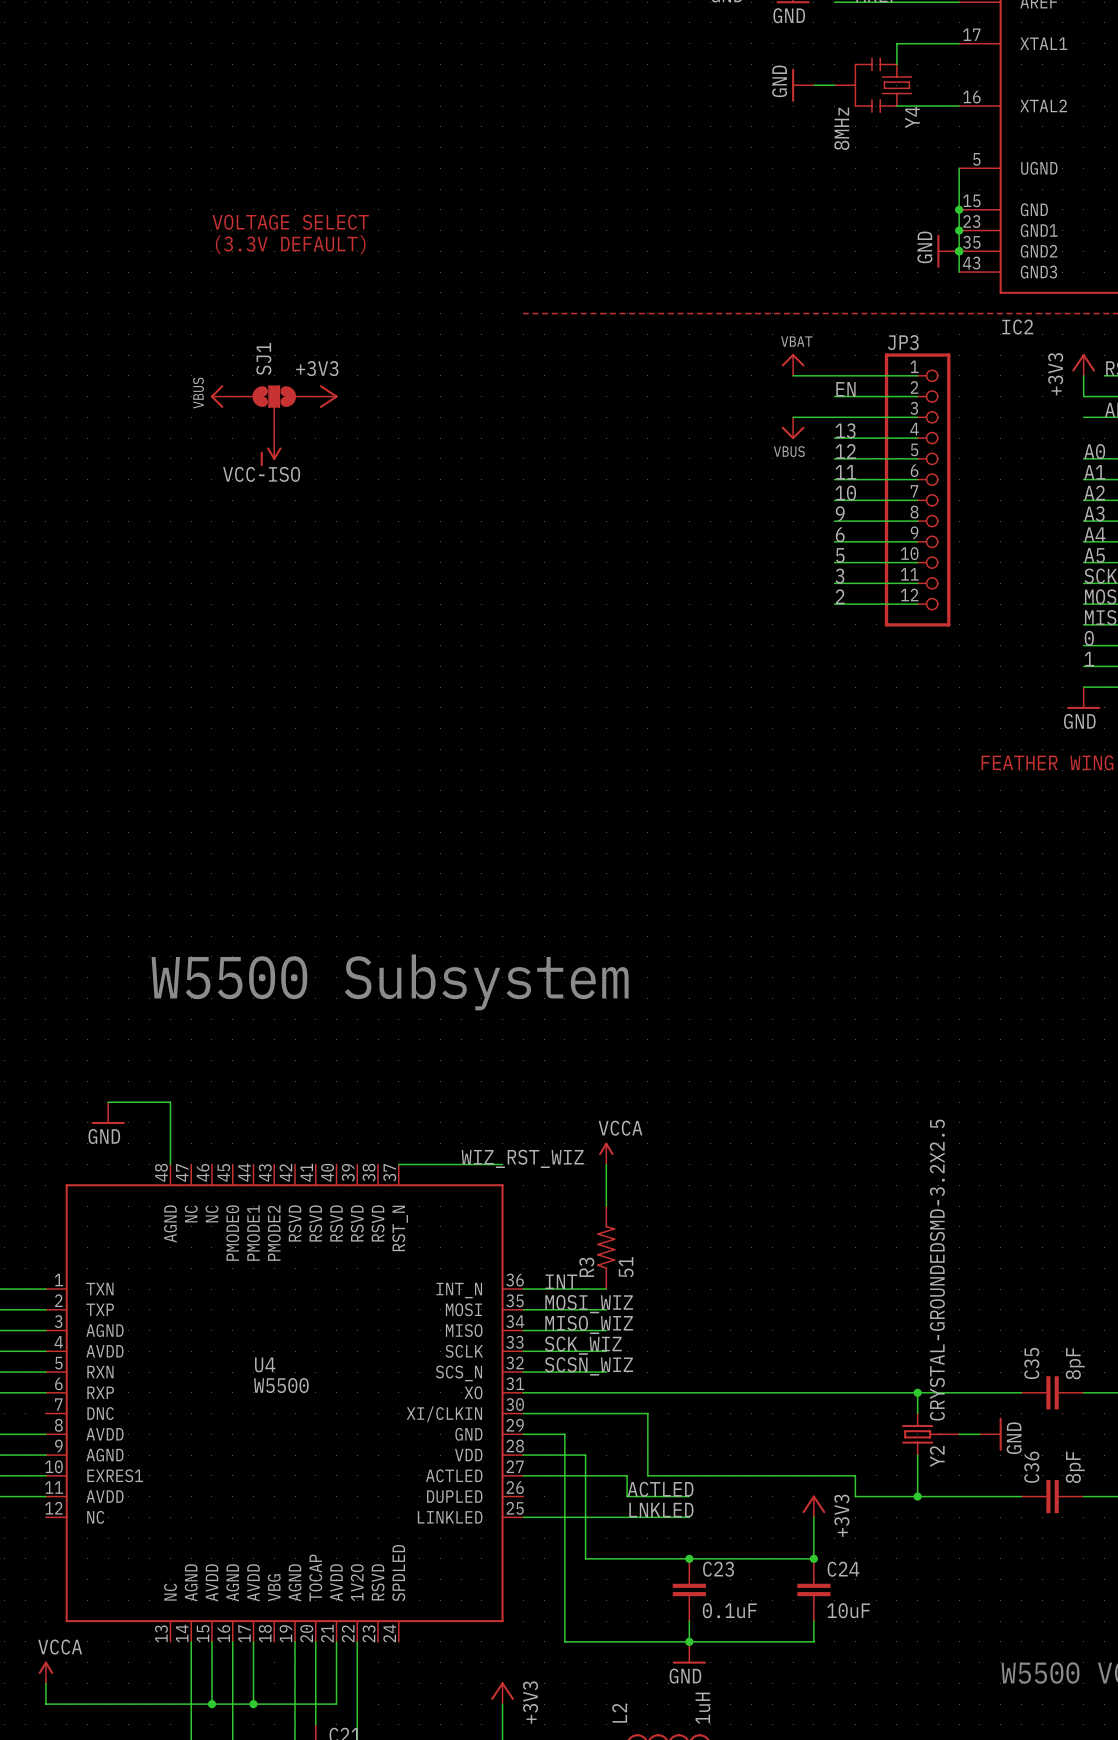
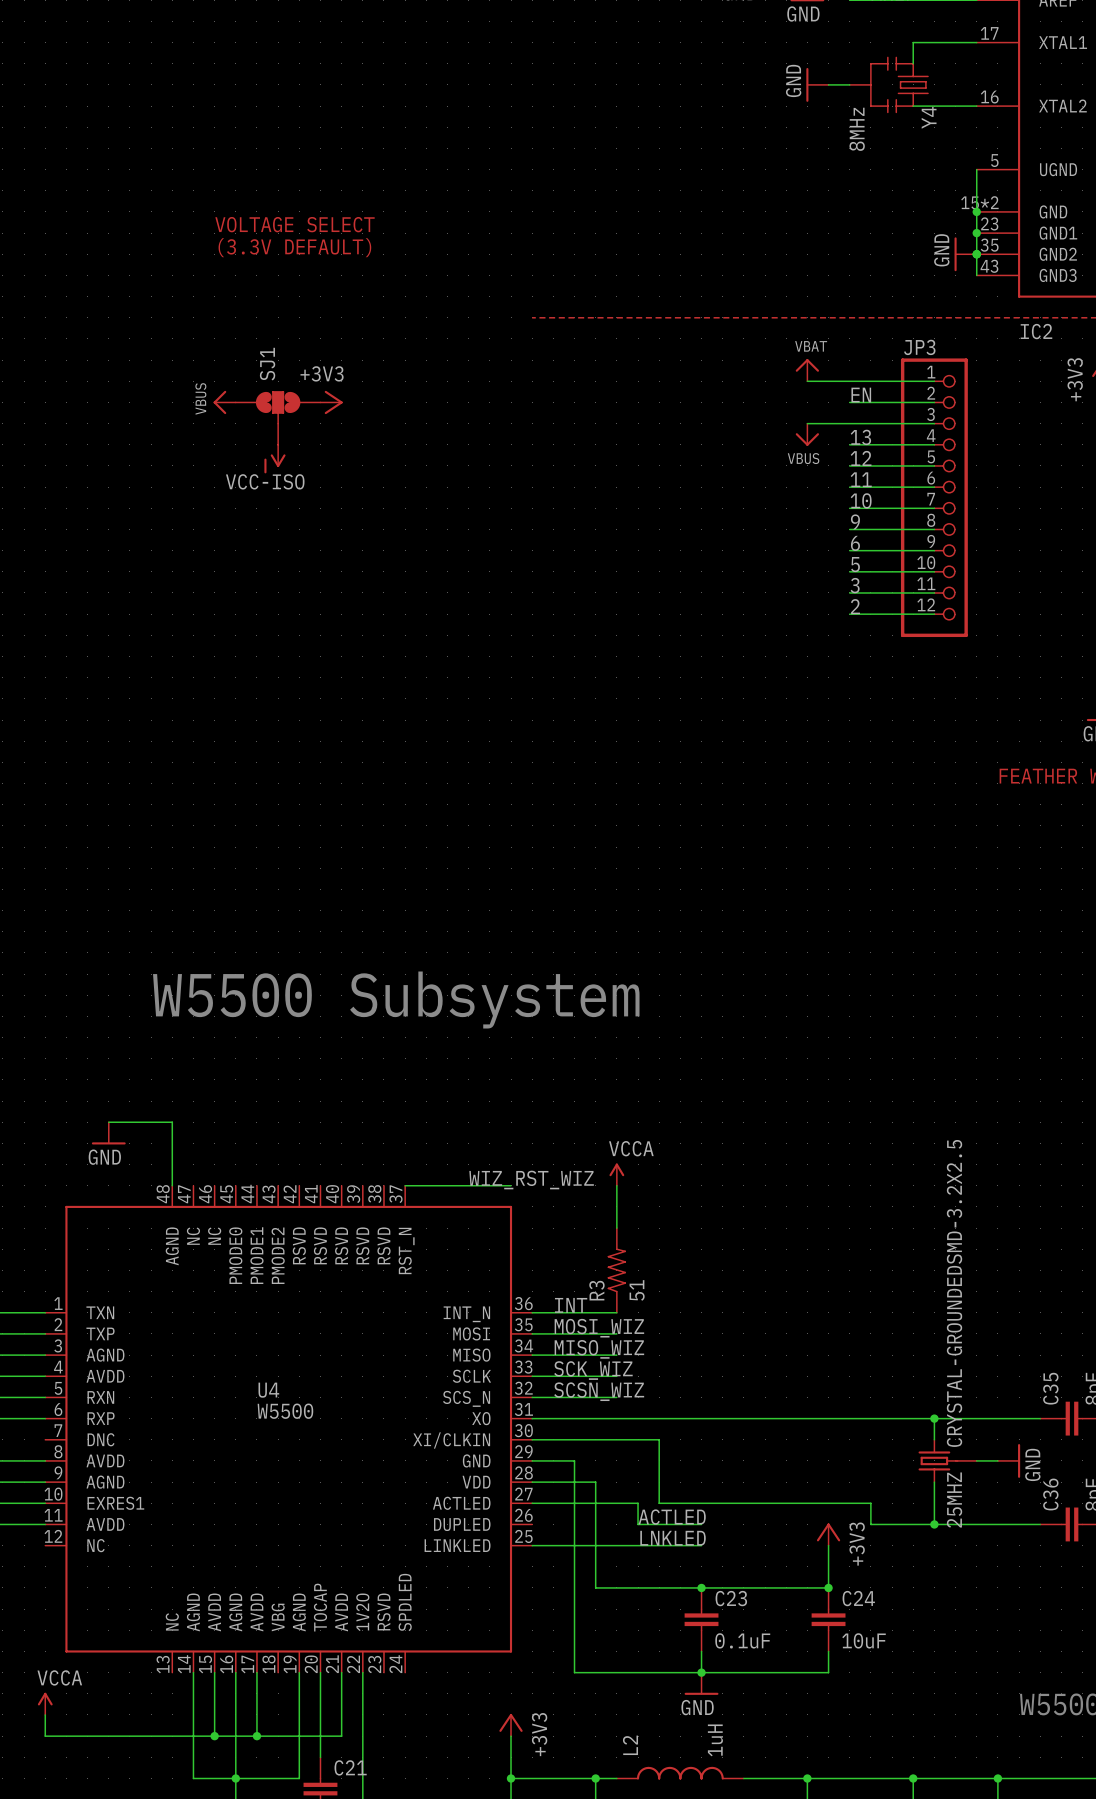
IC2 pin number: 15 (971, 200) -> 15*2 (979, 202)
Y2 name: Y2 (937, 1456) -> 25MHZ (954, 1500)

